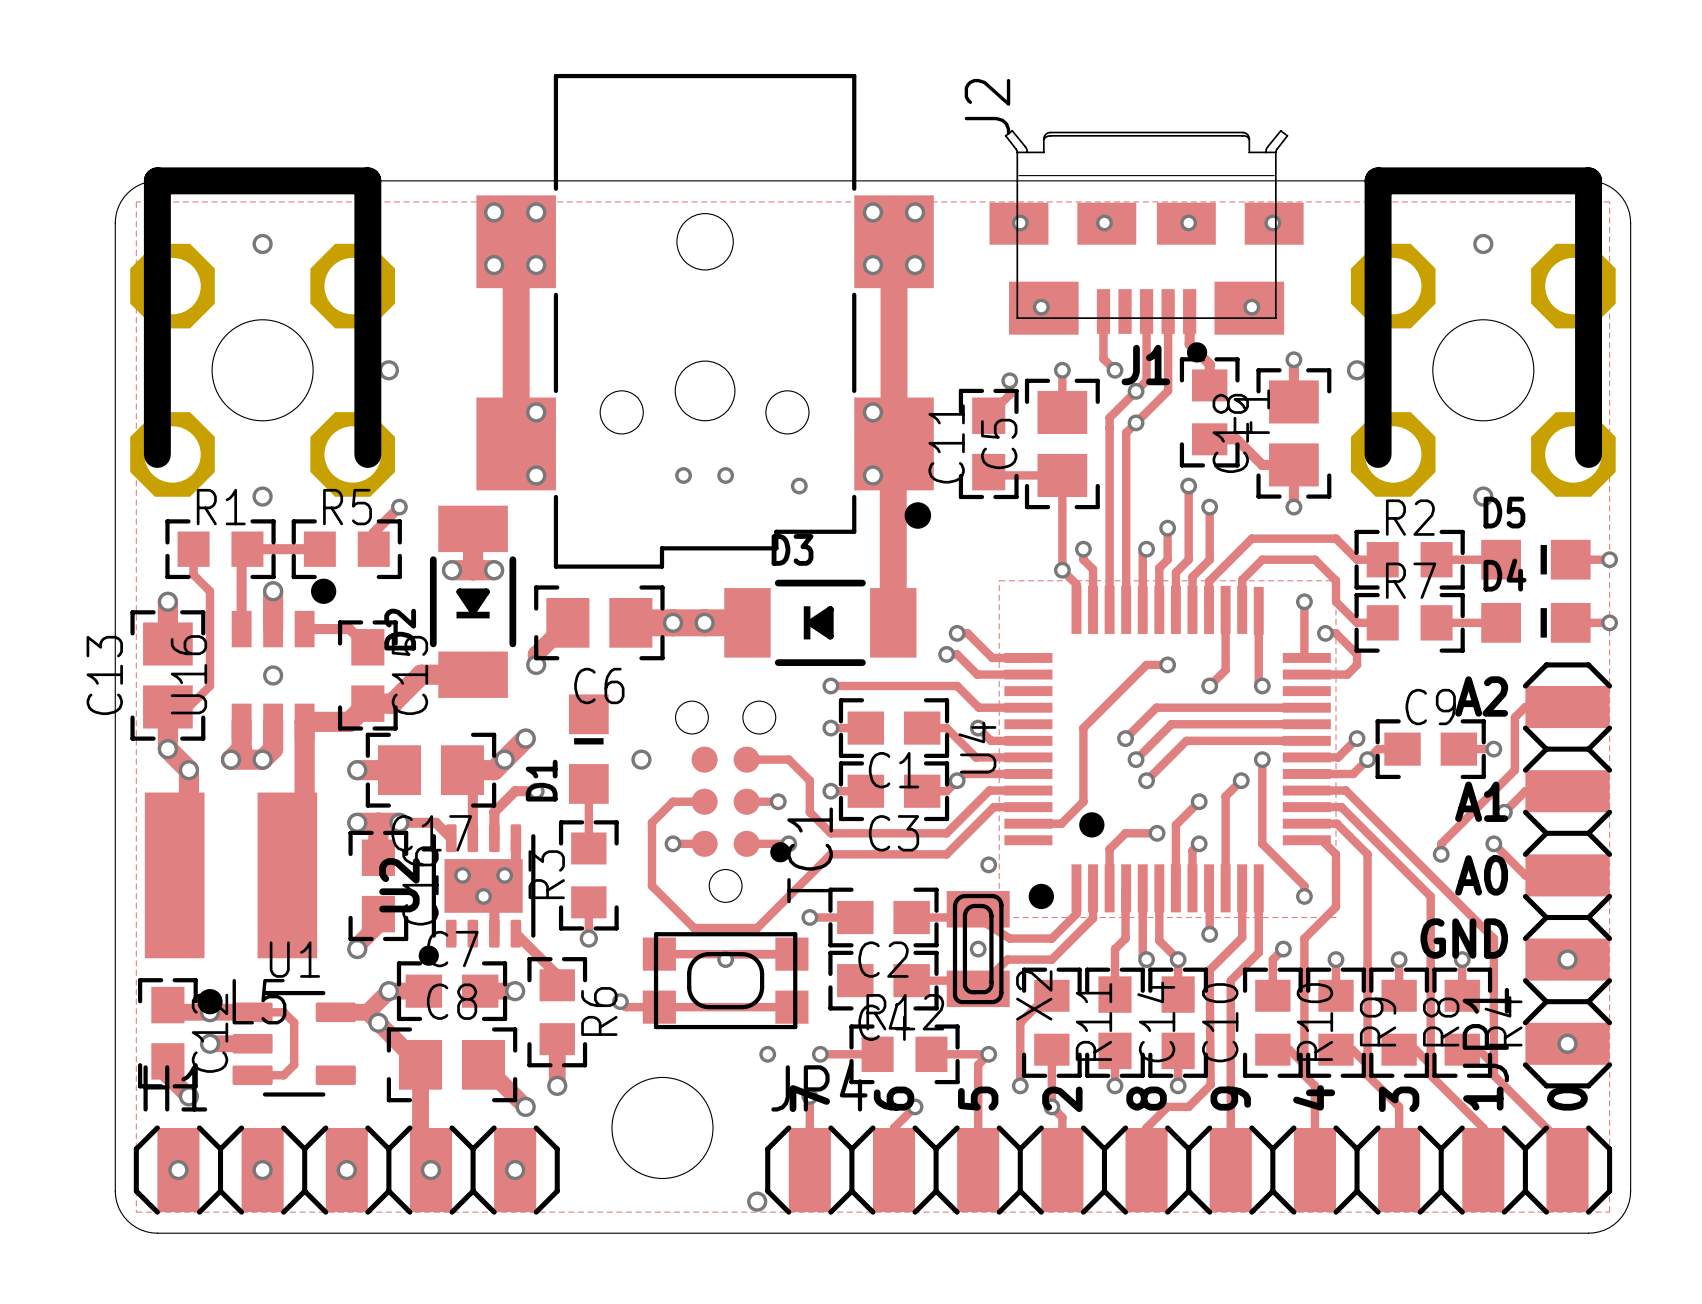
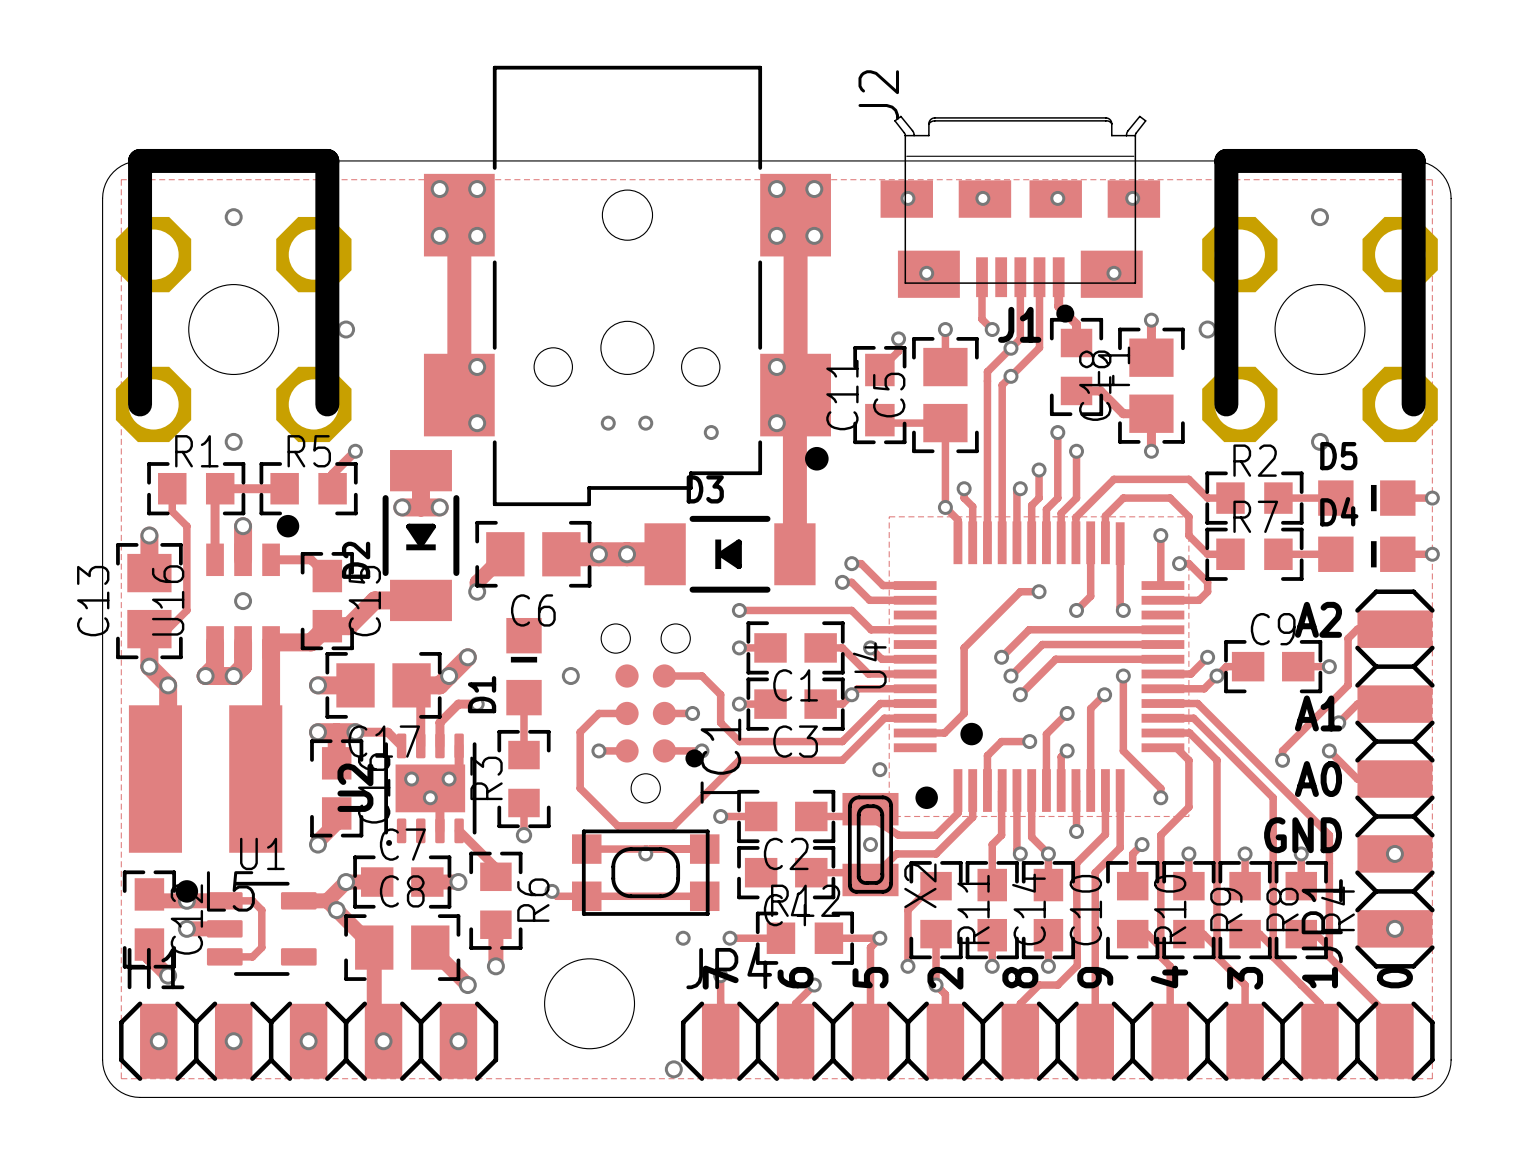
U2 footprint: [418, 824, 536, 966] -> [384, 733, 477, 846]

